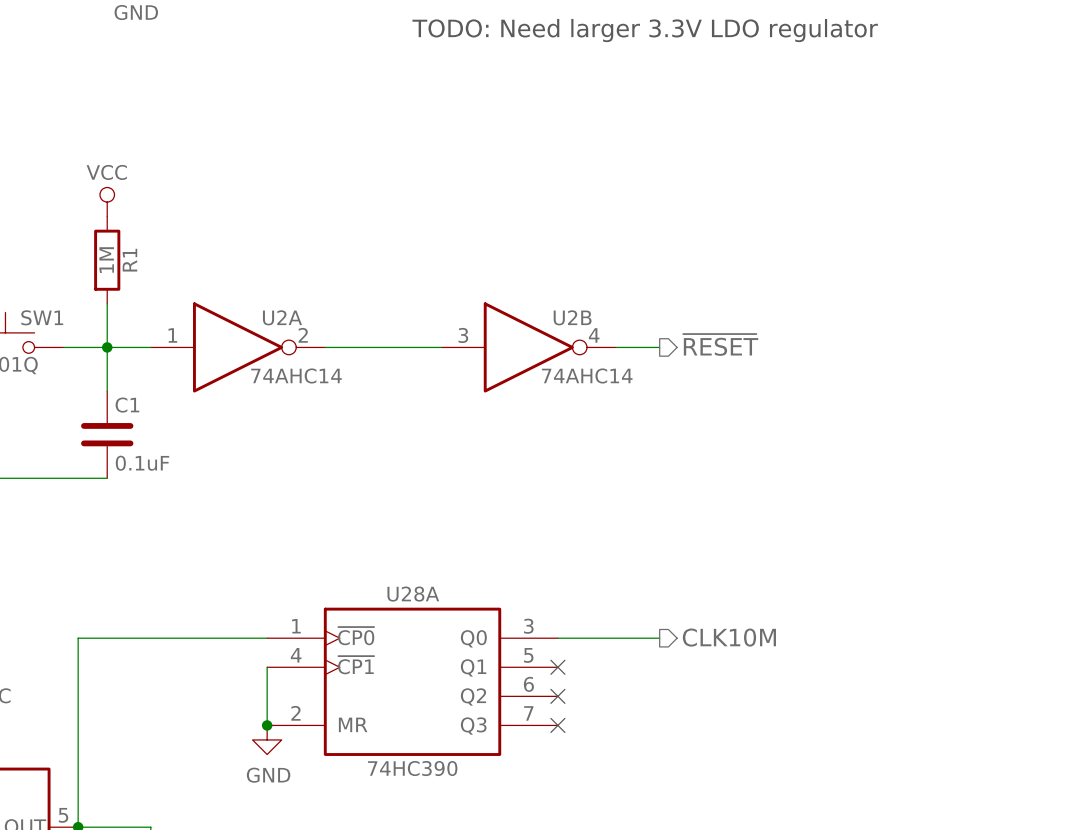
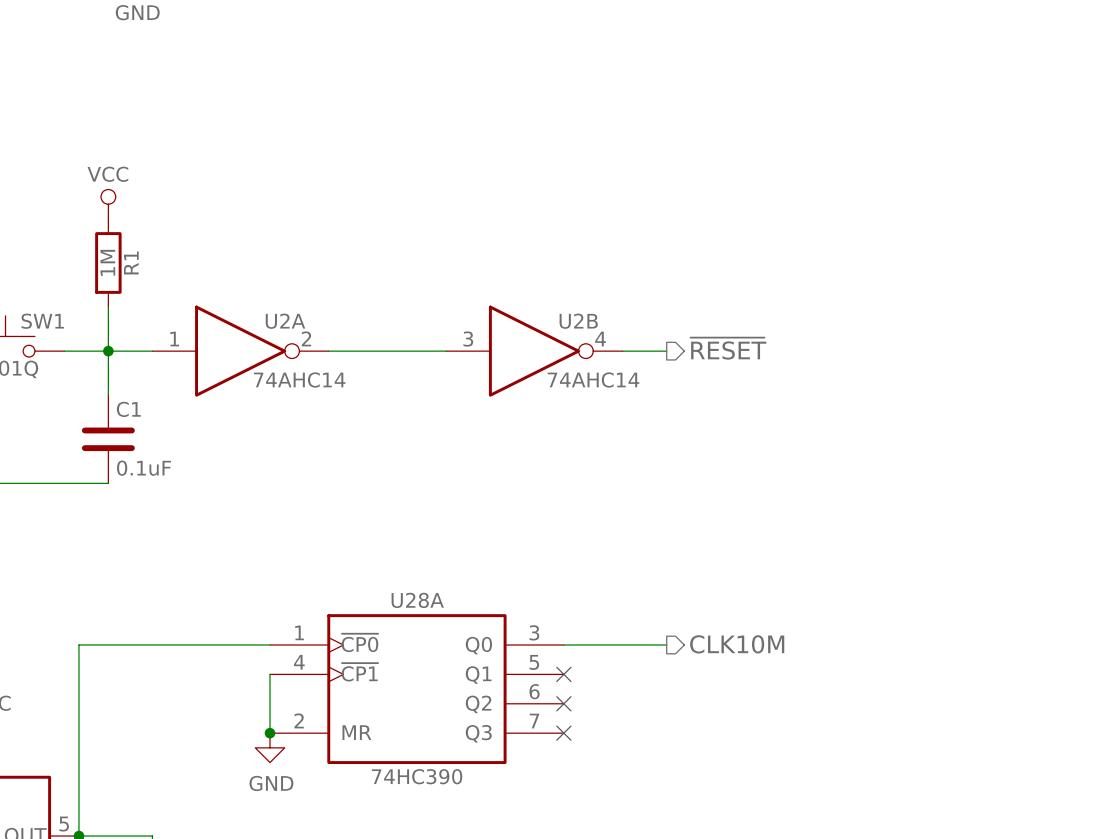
text: TODO: Need larger 3.3V LDO regulator (645, 30) -> none

